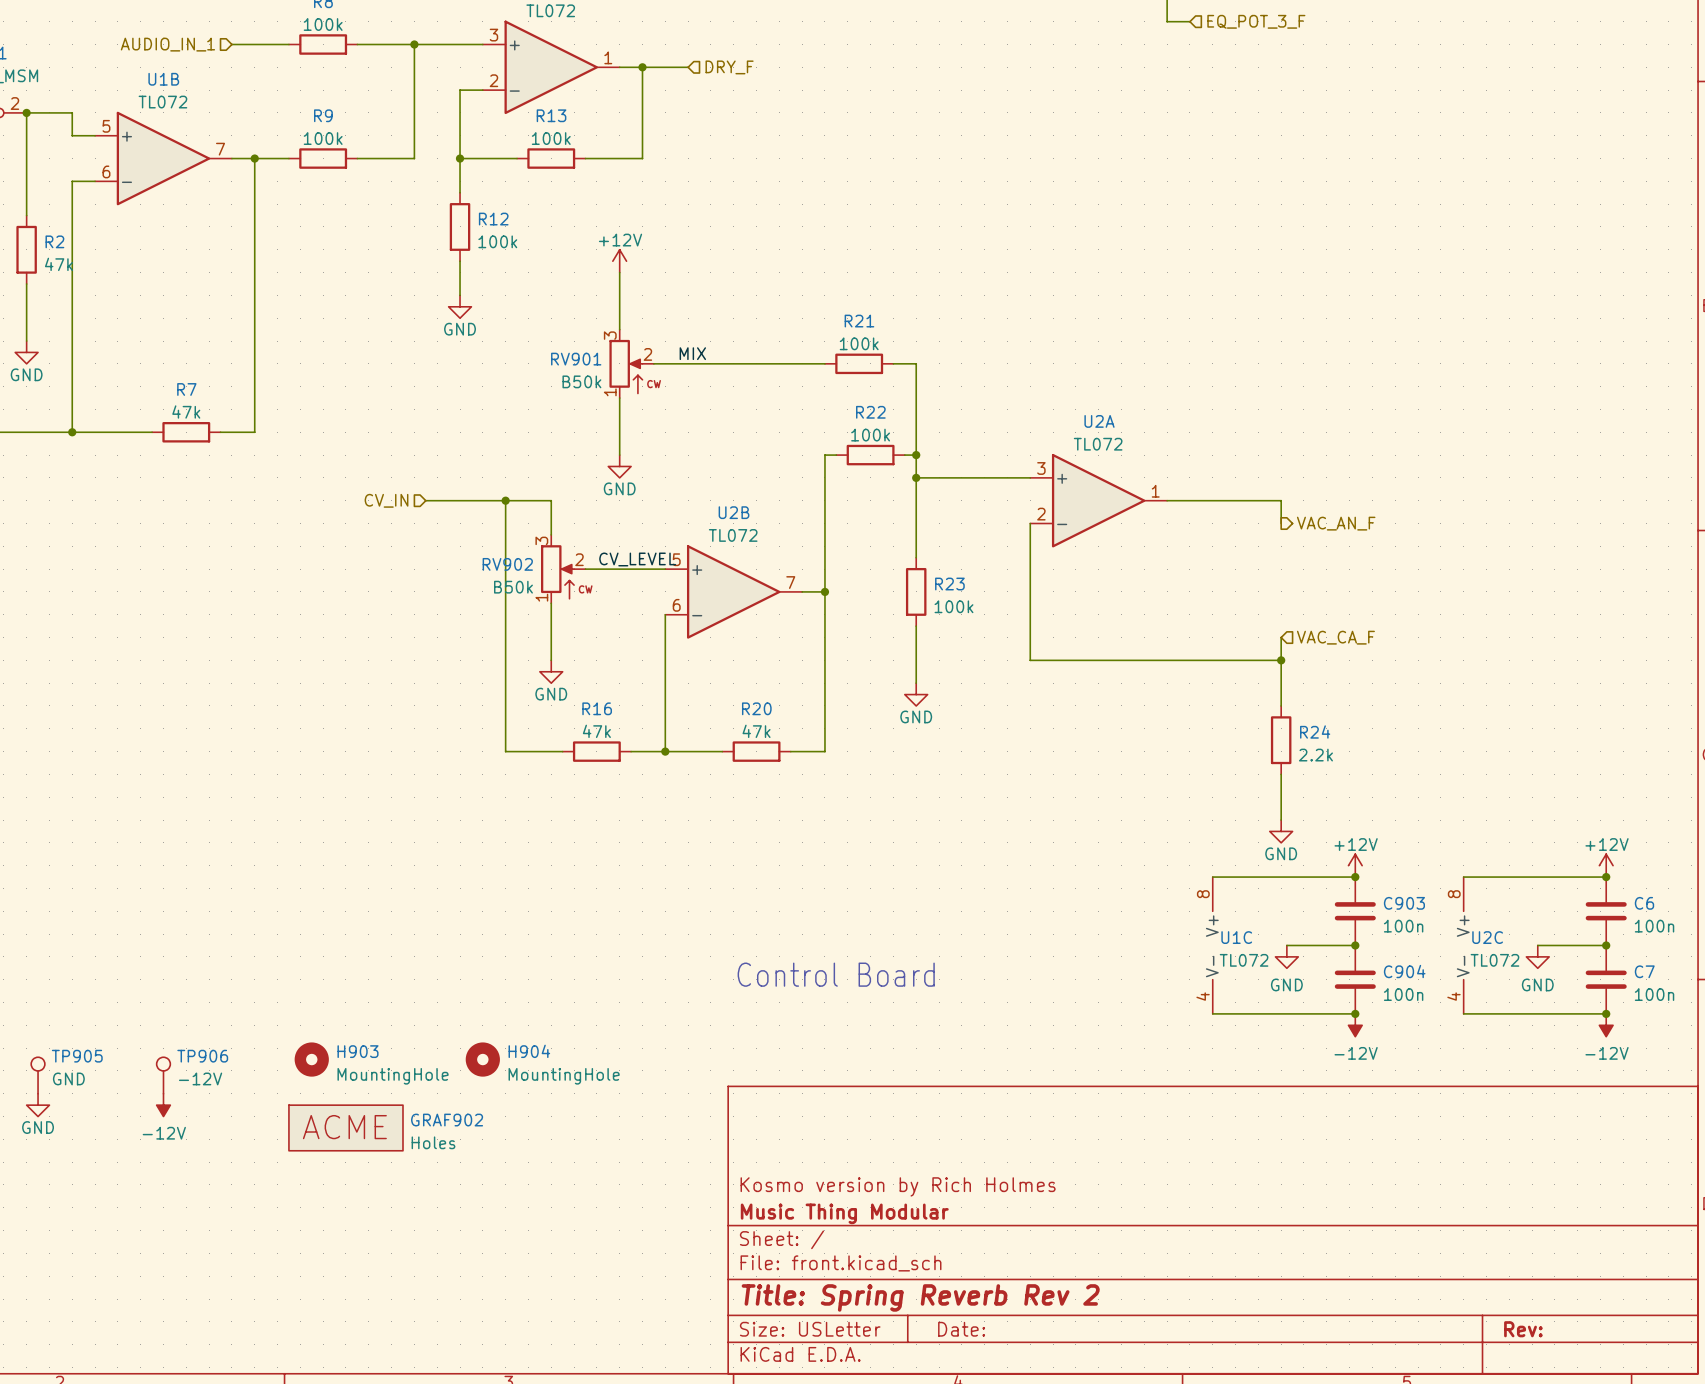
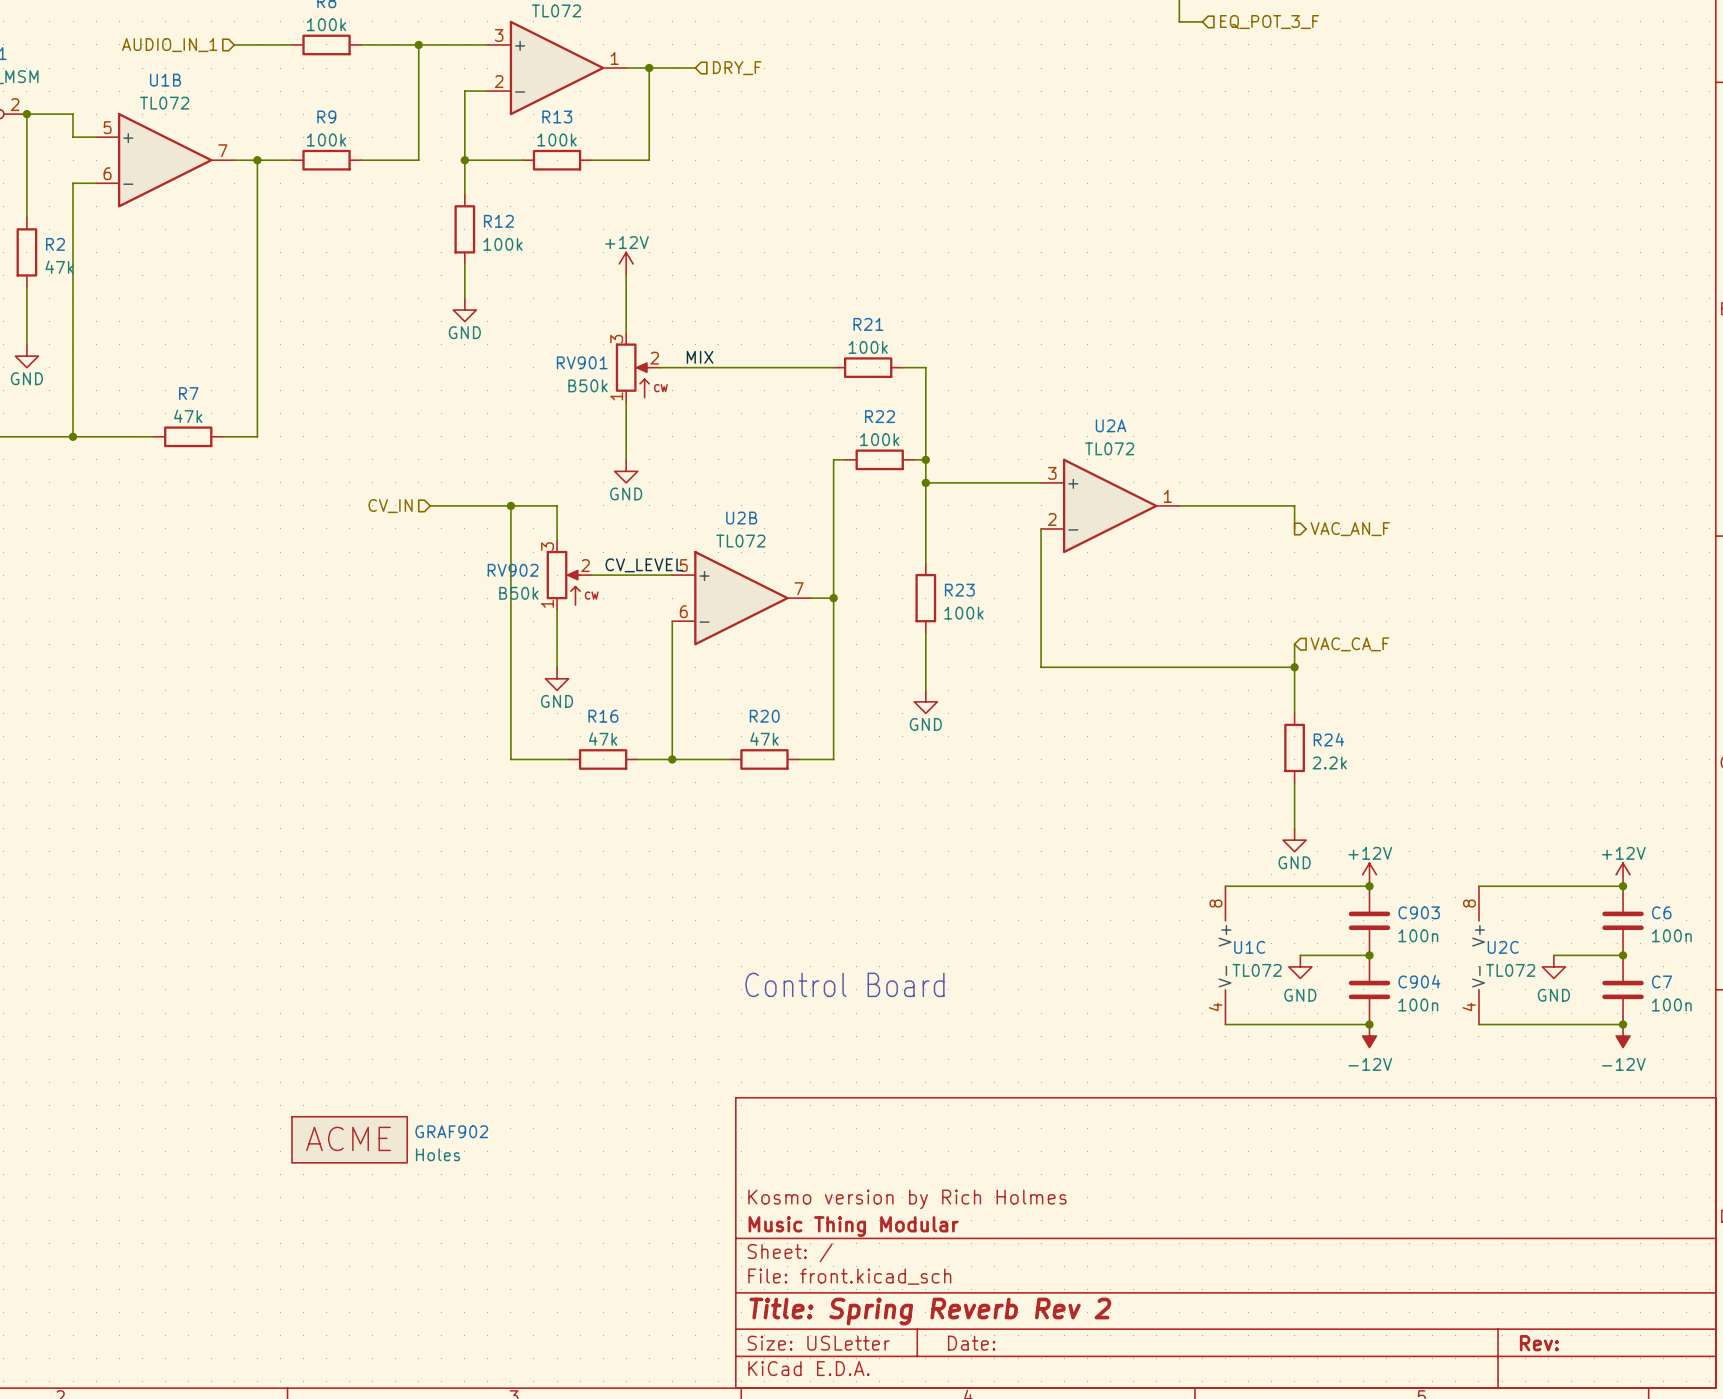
H903: MountingHole (311, 1059) -> none
H904: MountingHole (482, 1059) -> none
TP905: GND (38, 1075) -> none
TP906: -12V (163, 1075) -> none
power symbol: GND (38, 1105) -> none
power symbol: -12V (163, 1105) -> none

